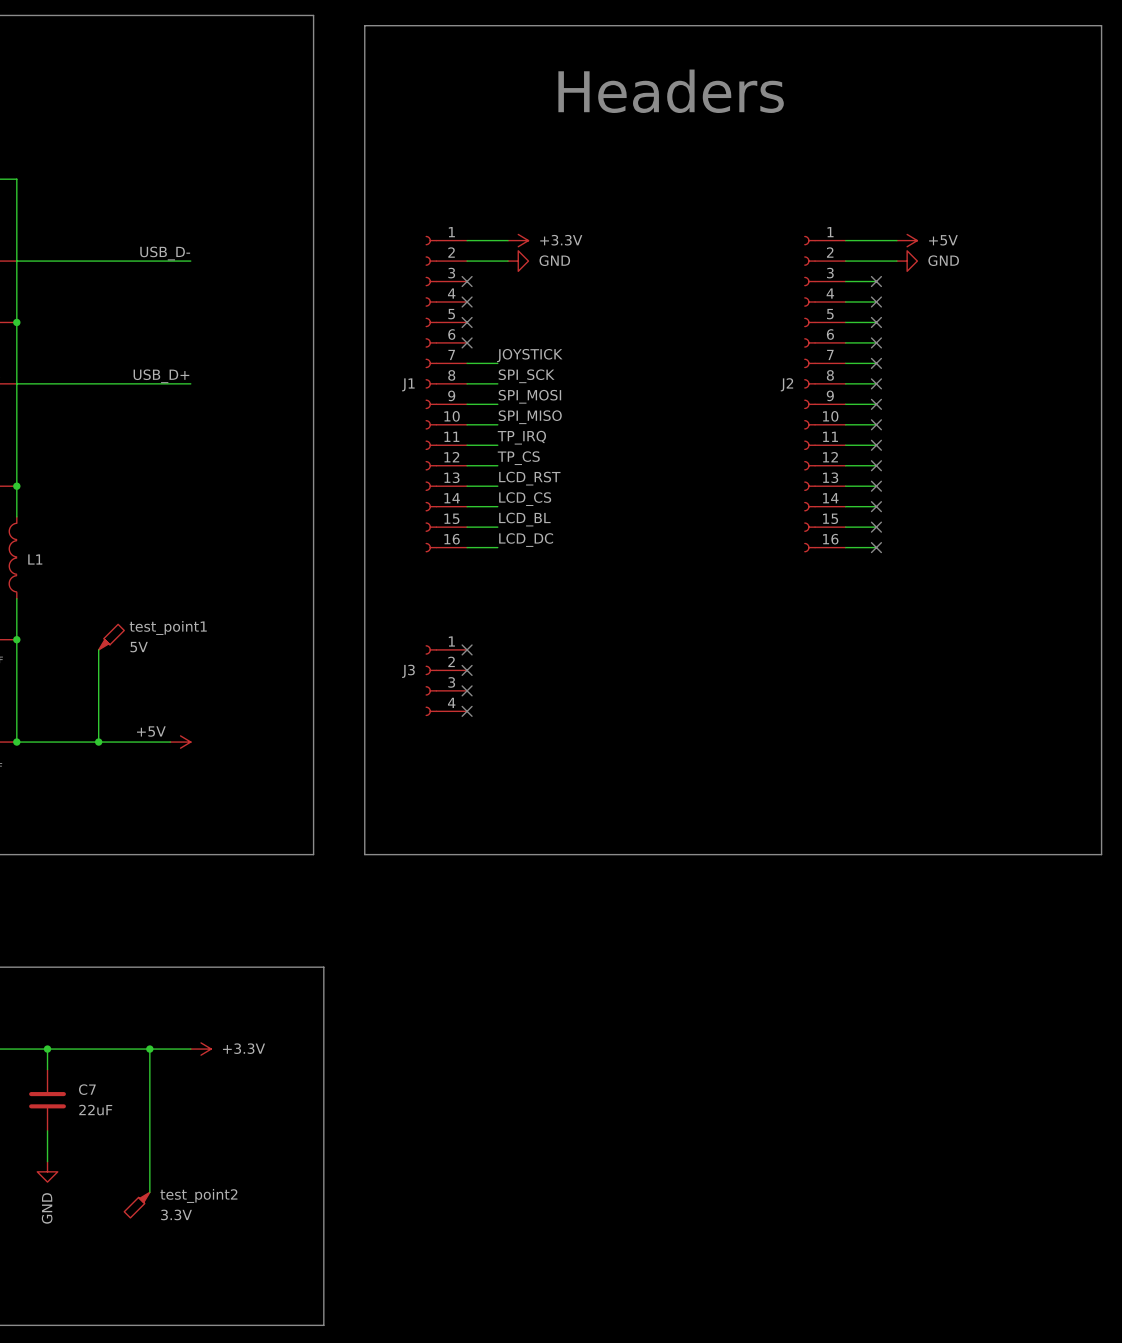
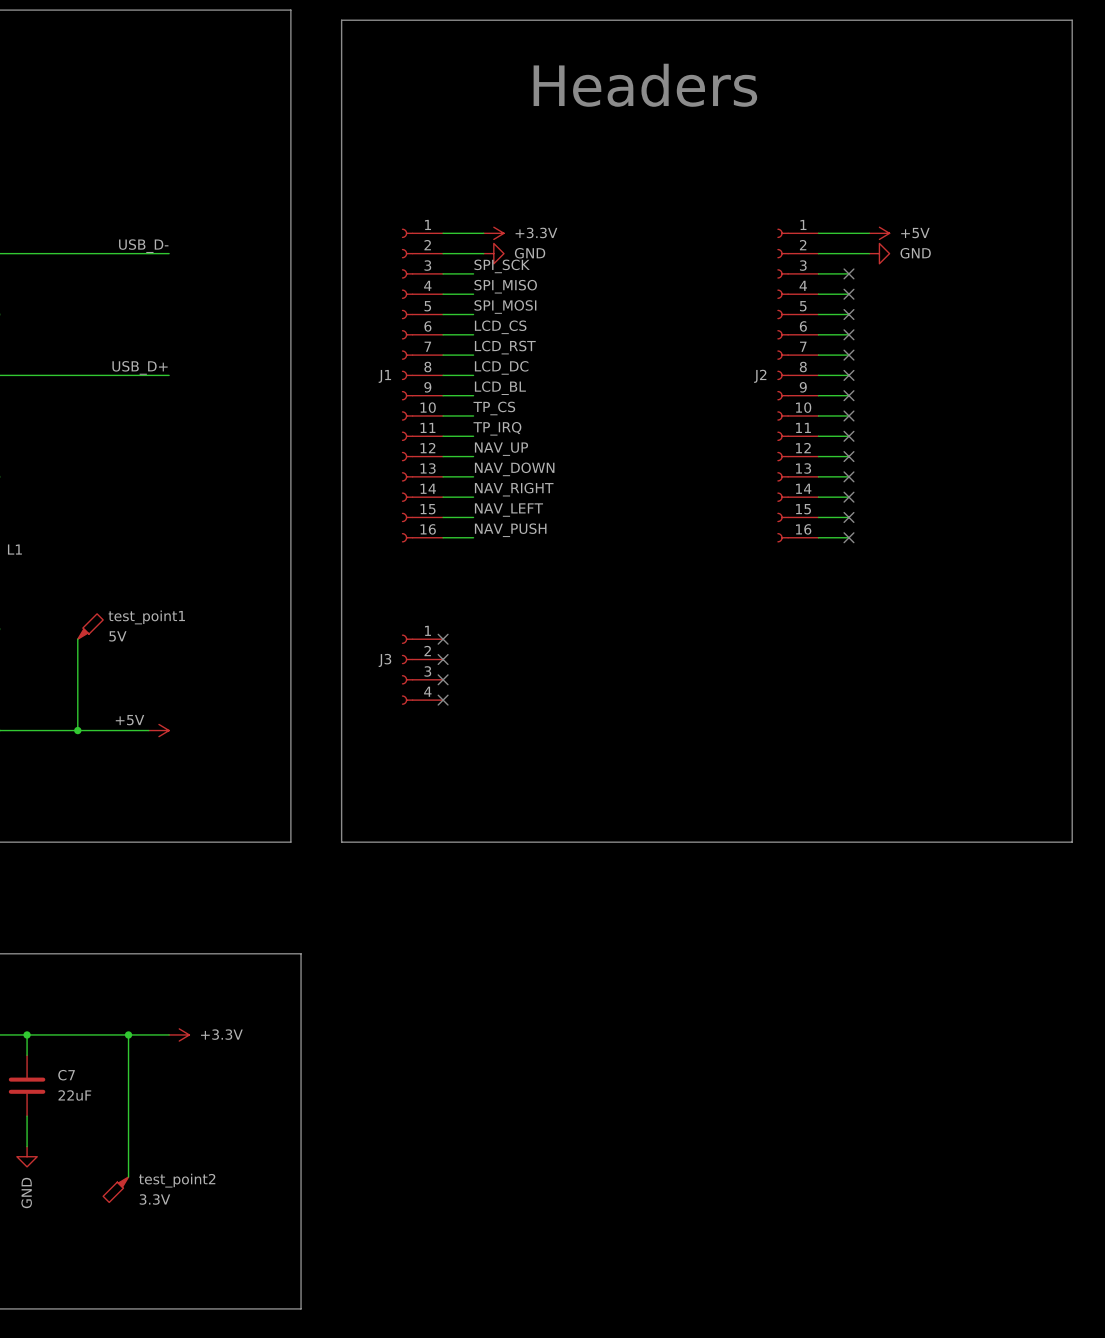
label: none -> SPI_SCK (502, 266)
wire: none -> (443, 273) (473, 273)
no-connect mark: (467, 281) -> none
label: none -> SPI_MISO (505, 286)
wire: none -> (443, 294) (473, 294)
no-connect mark: (467, 301) -> none
label: none -> SPI_MOSI (505, 307)
wire: none -> (443, 314) (473, 314)
no-connect mark: (467, 322) -> none
label: none -> LCD_CS (500, 327)
wire: none -> (443, 334) (473, 334)
no-connect mark: (467, 342) -> none
label: JOYSTICK (529, 355) -> LCD_RST (505, 347)
label: SPI_SCK (526, 376) -> LCD_DC (501, 367)
label: SPI_MOSI (529, 396) -> LCD_BL (500, 388)
label: SPI_MISO (530, 417) -> TP_CS (494, 408)
label: TP_CS (518, 458) -> NAV_UP (501, 449)
label: LCD_RST (529, 478) -> NAV_DOWN (514, 469)
label: LCD_CS (525, 499) -> NAV_RIGHT (514, 489)
label: LCD_BL (524, 519) -> NAV_LEFT (508, 510)
label: LCD_DC (526, 540) -> NAV_PUSH (510, 530)

